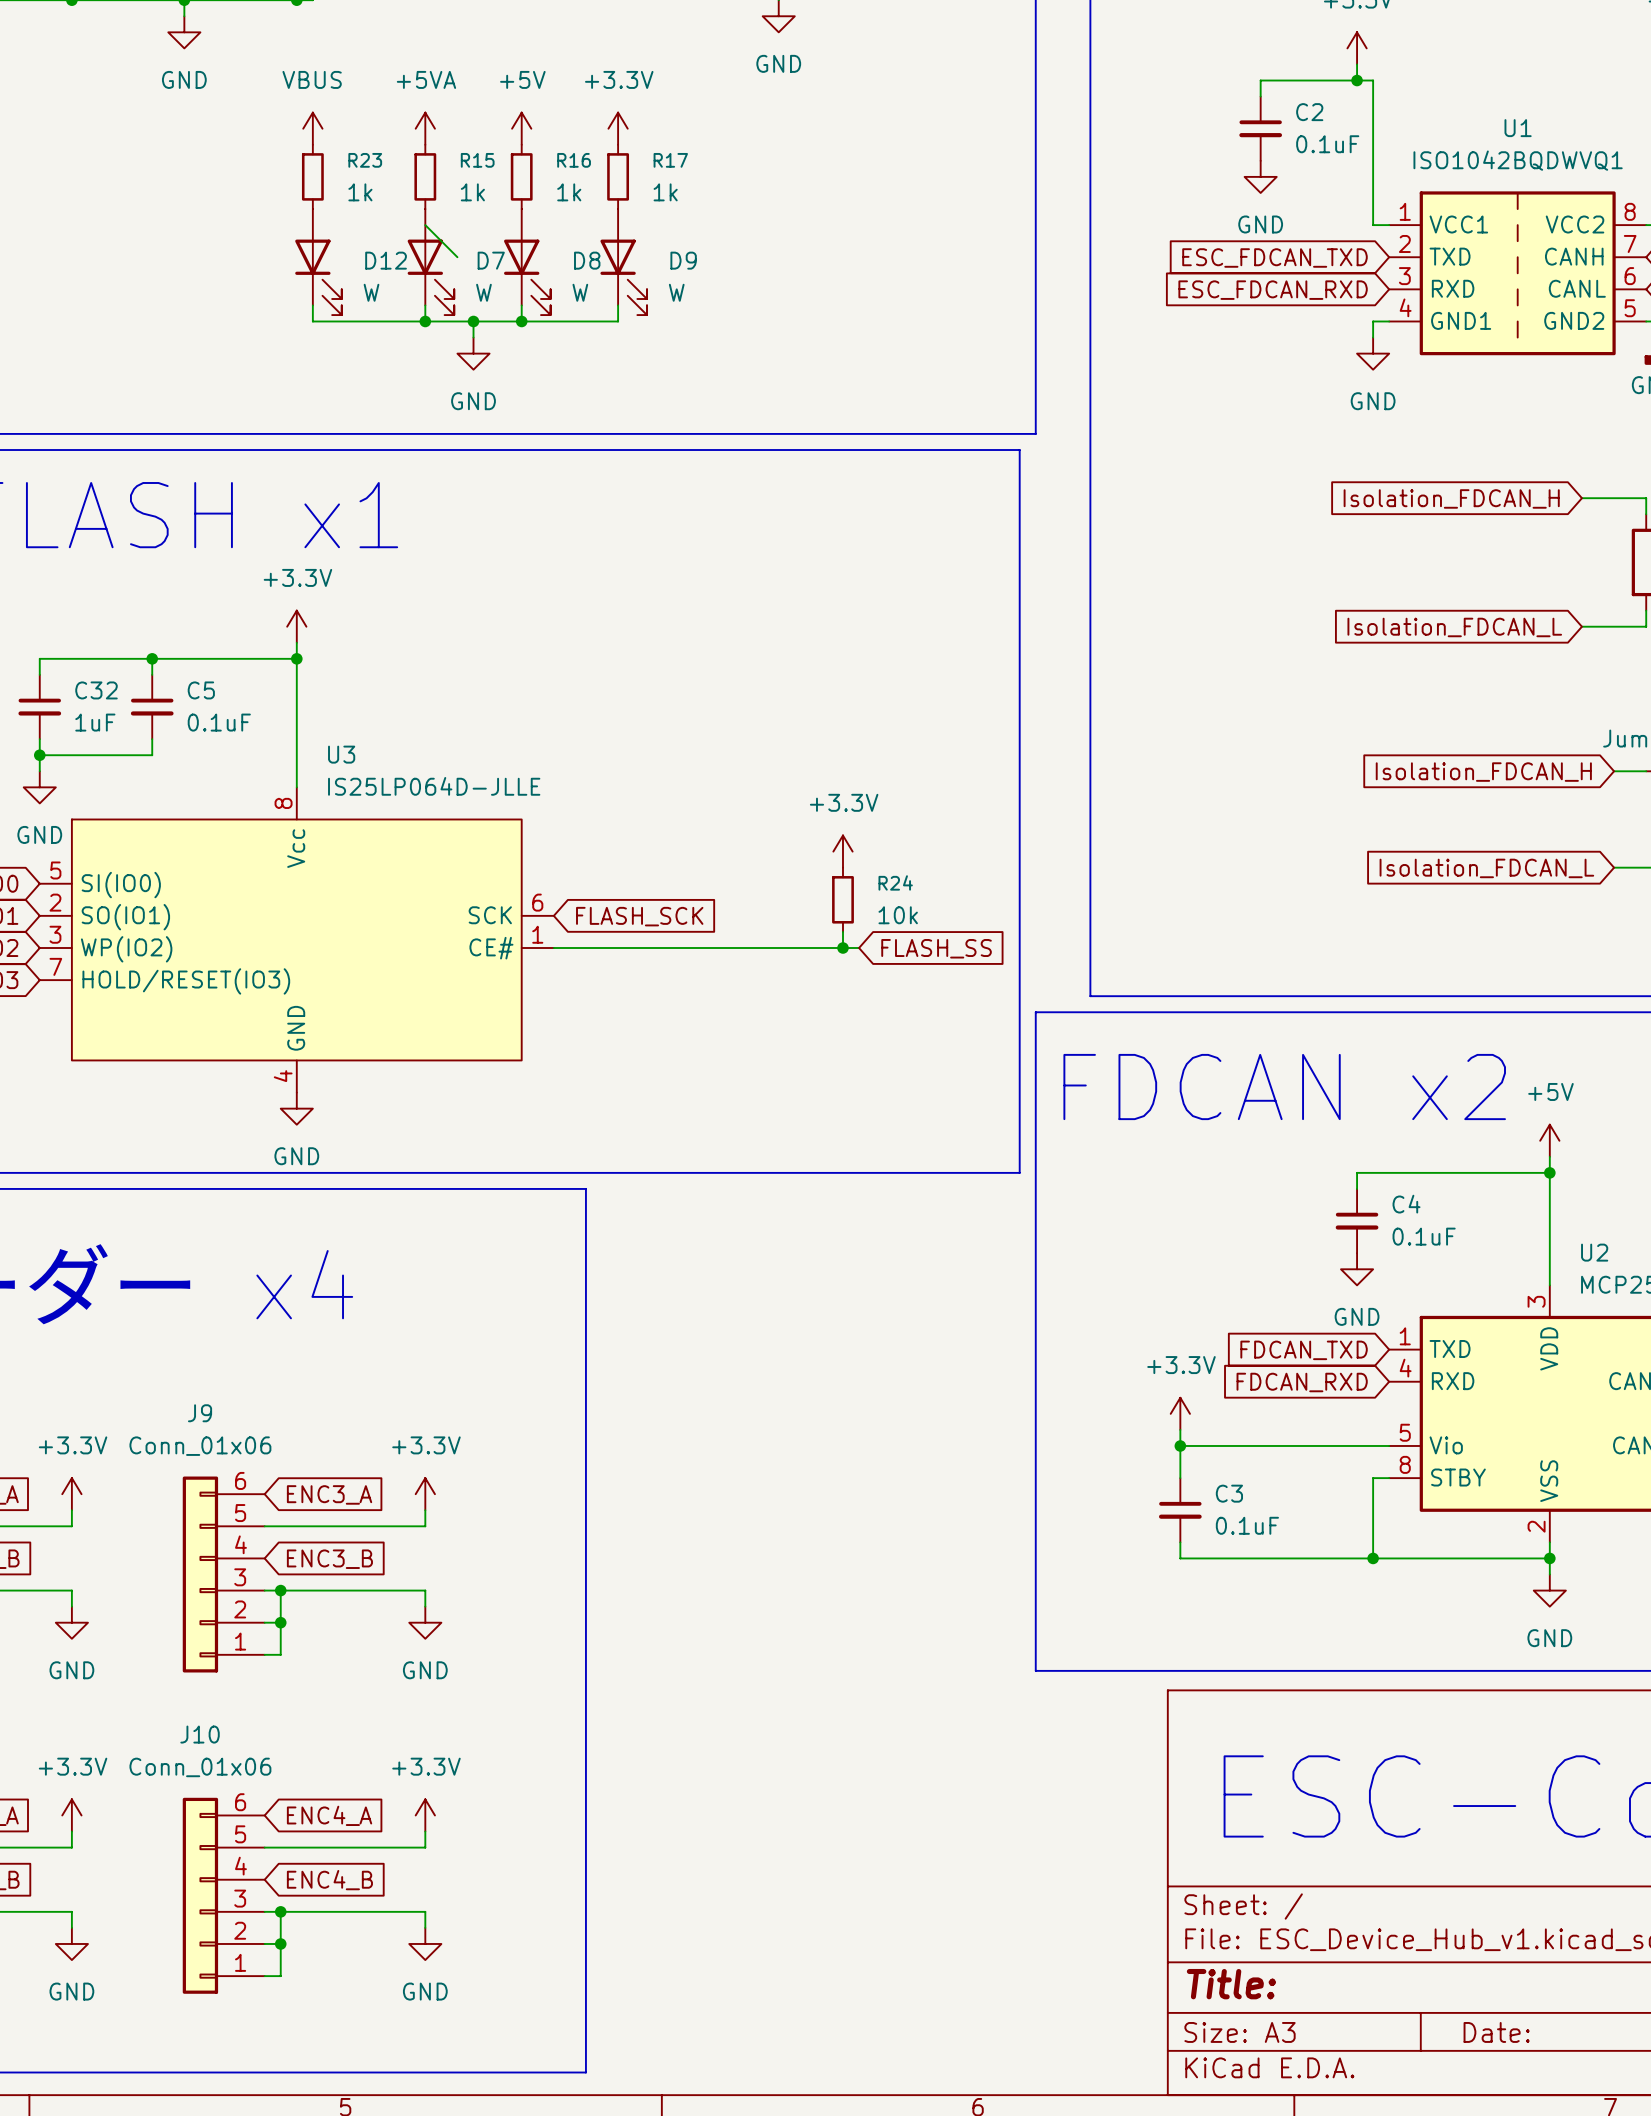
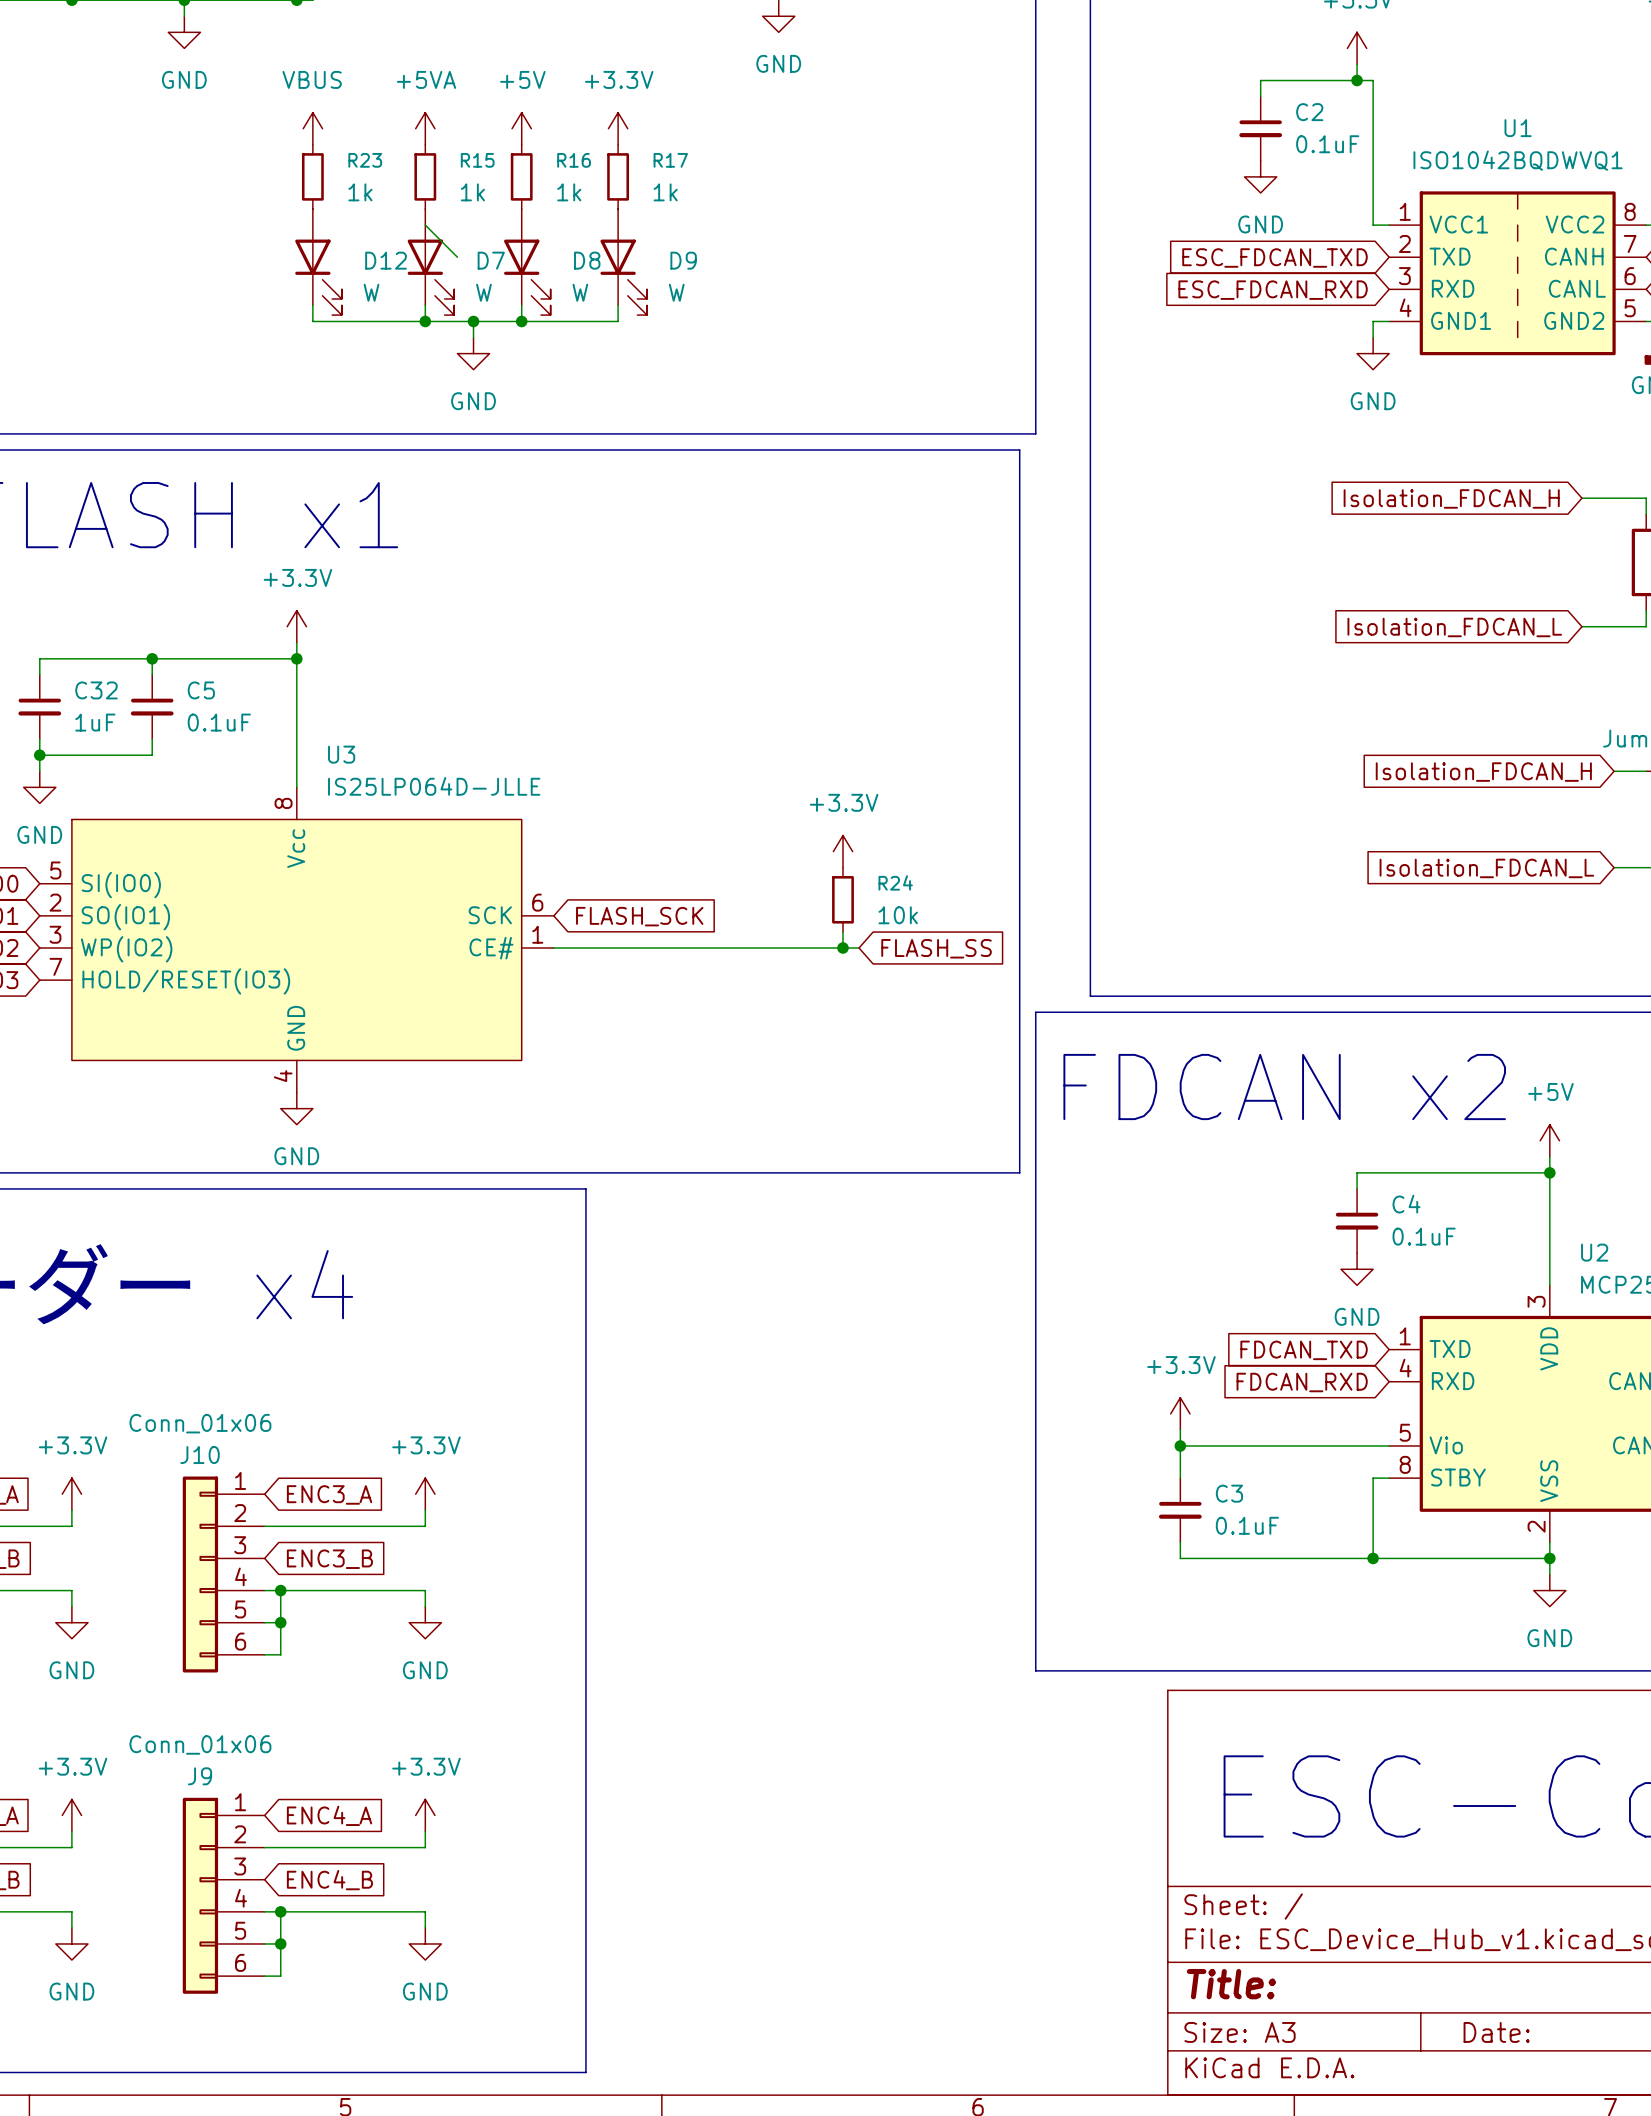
J9 name position: J9 (200, 1413) -> J9 (200, 1776)
J9 flip: as is (200, 1574) -> up-down (200, 1895)
J9 position: (223, 1574) -> (223, 1895)
J10 name position: J10 (200, 1734) -> J10 (200, 1455)
J10 flip: as is (200, 1895) -> up-down (200, 1574)
J10 position: (223, 1895) -> (223, 1574)

